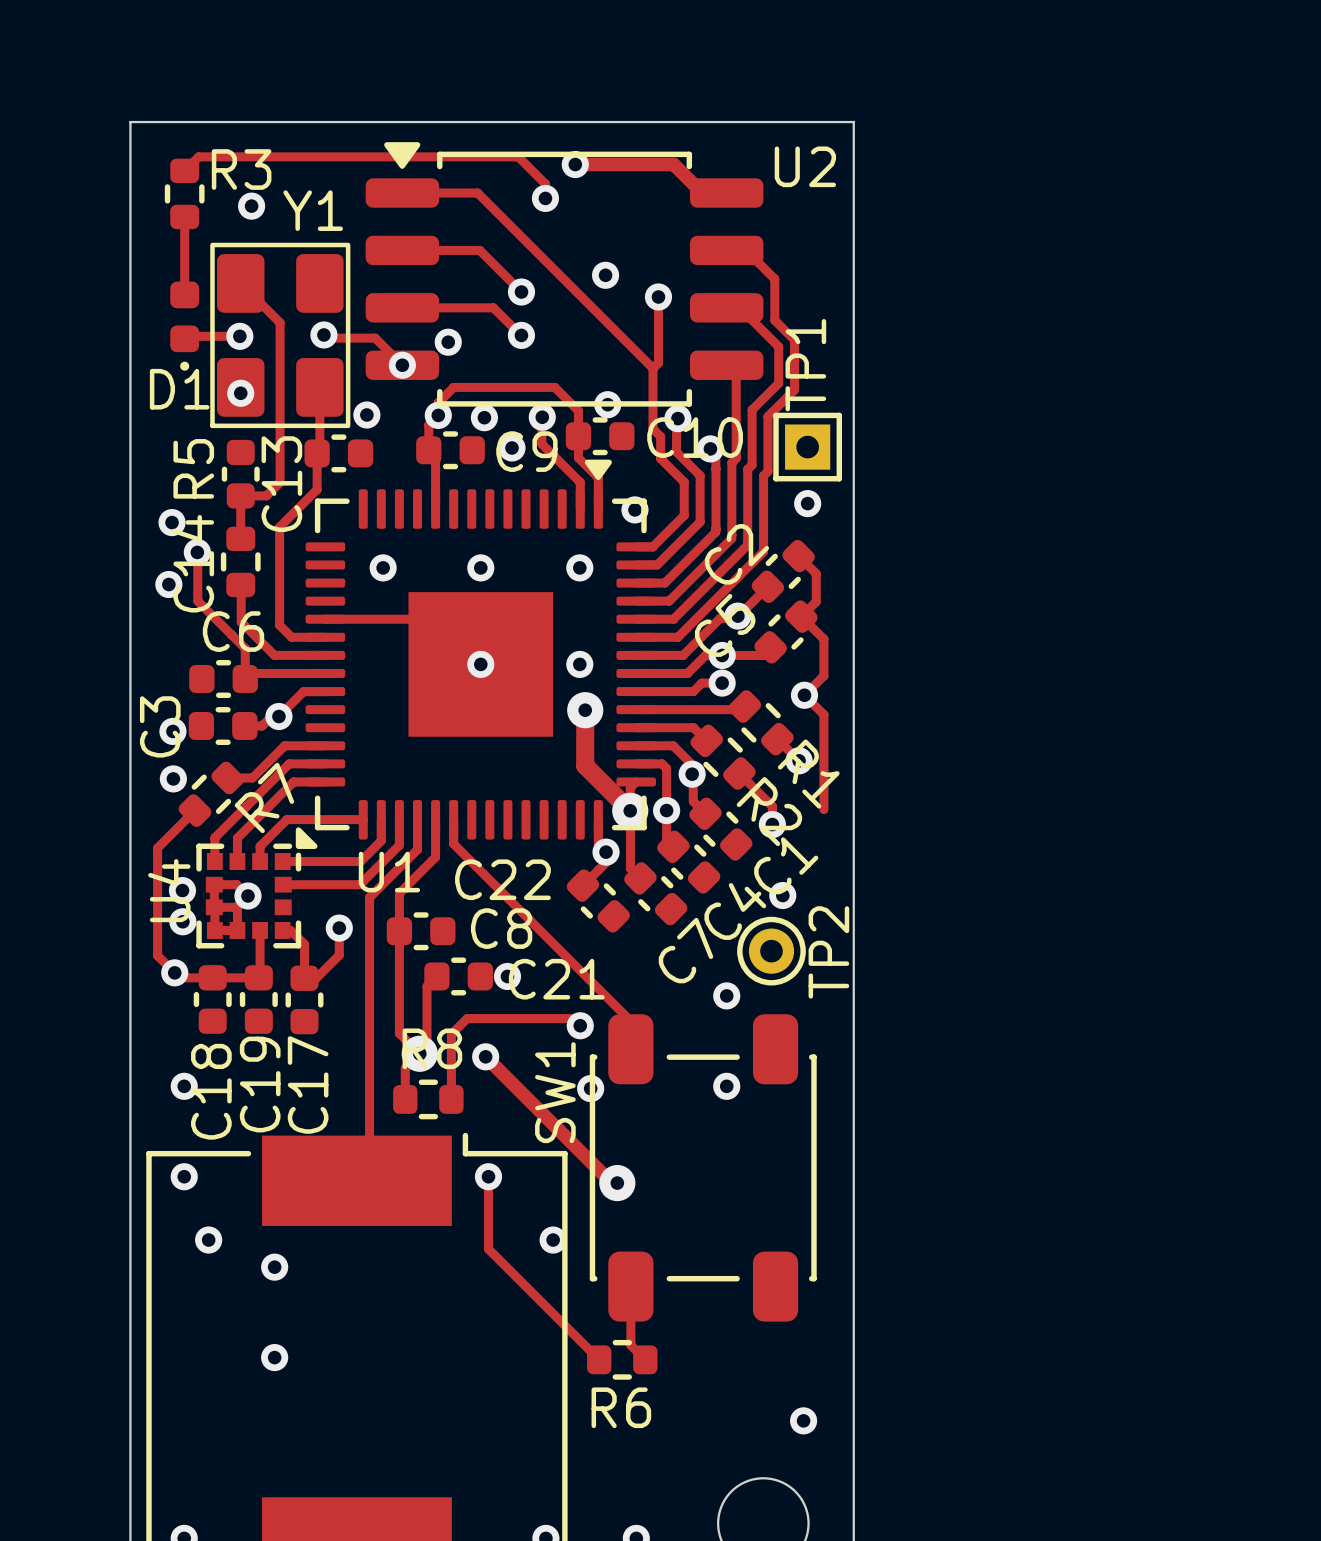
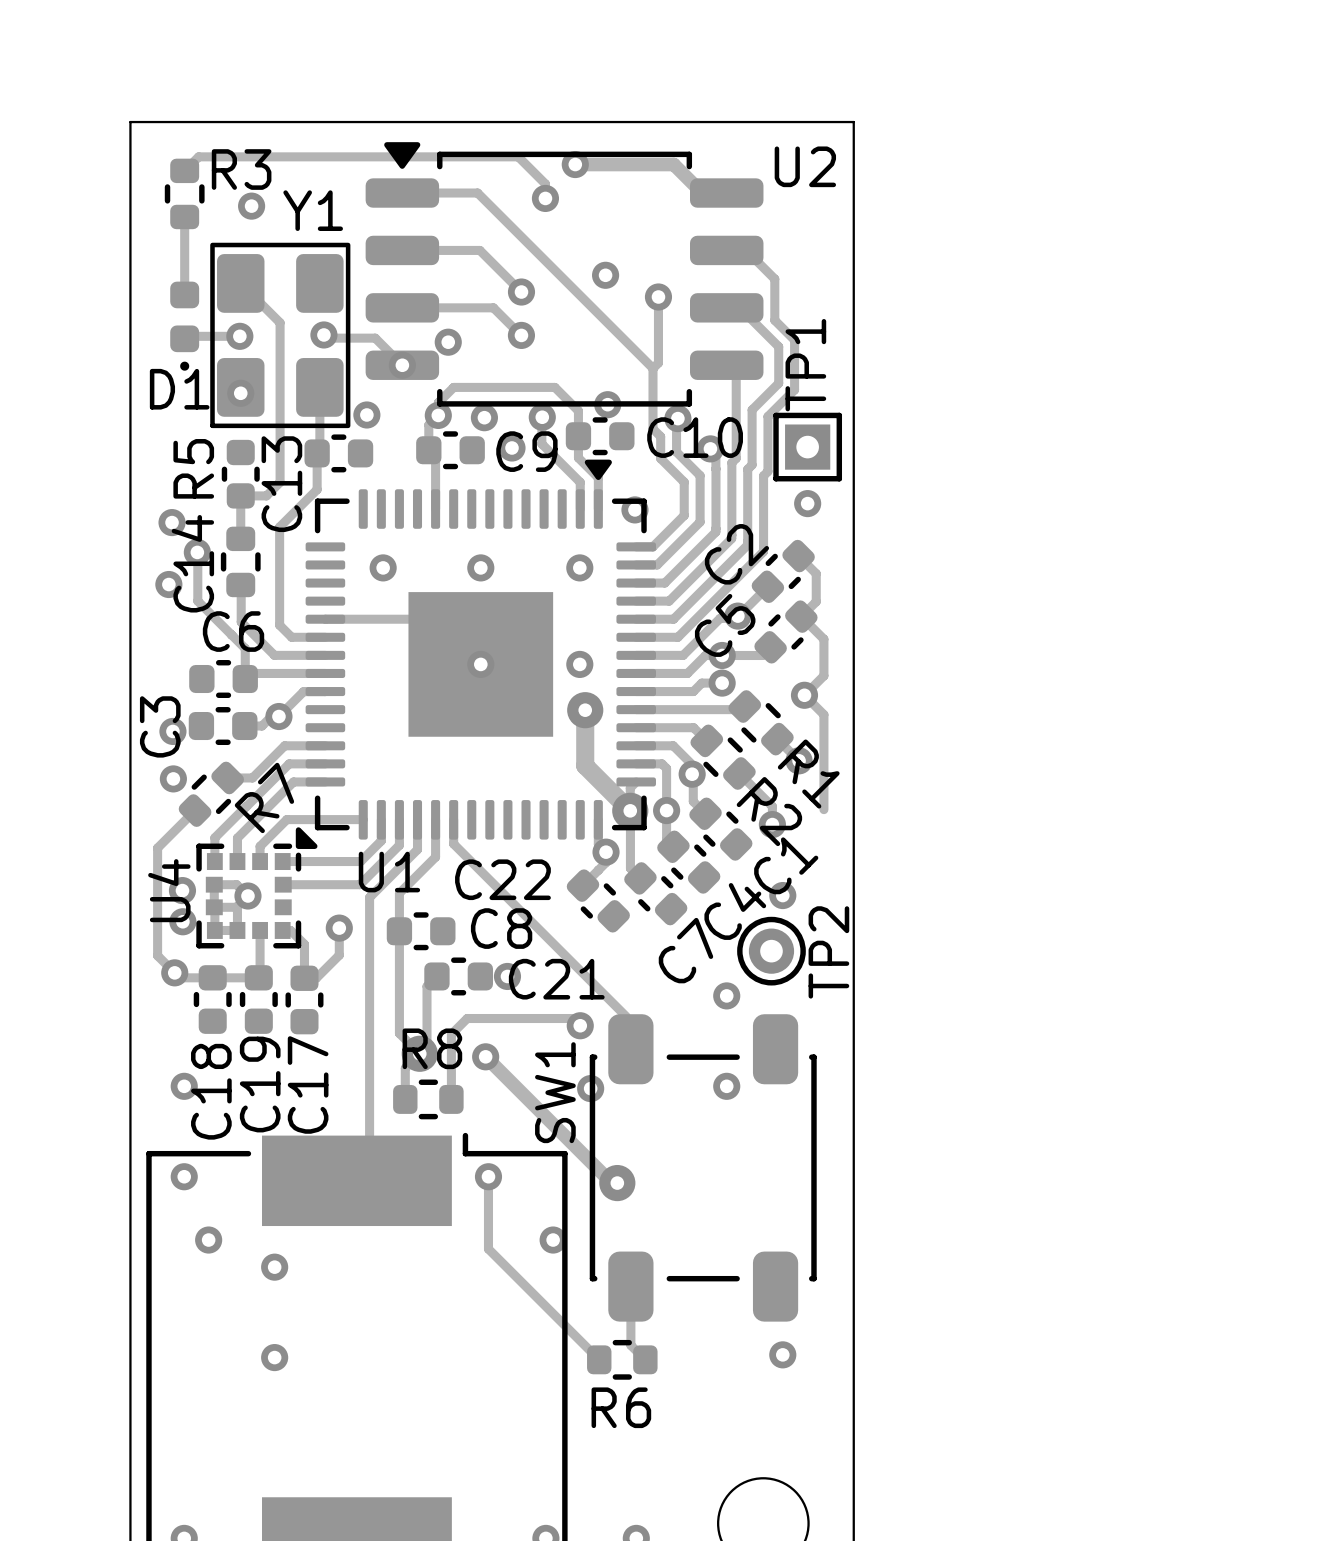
via position: (803, 1420) -> (782, 1354)

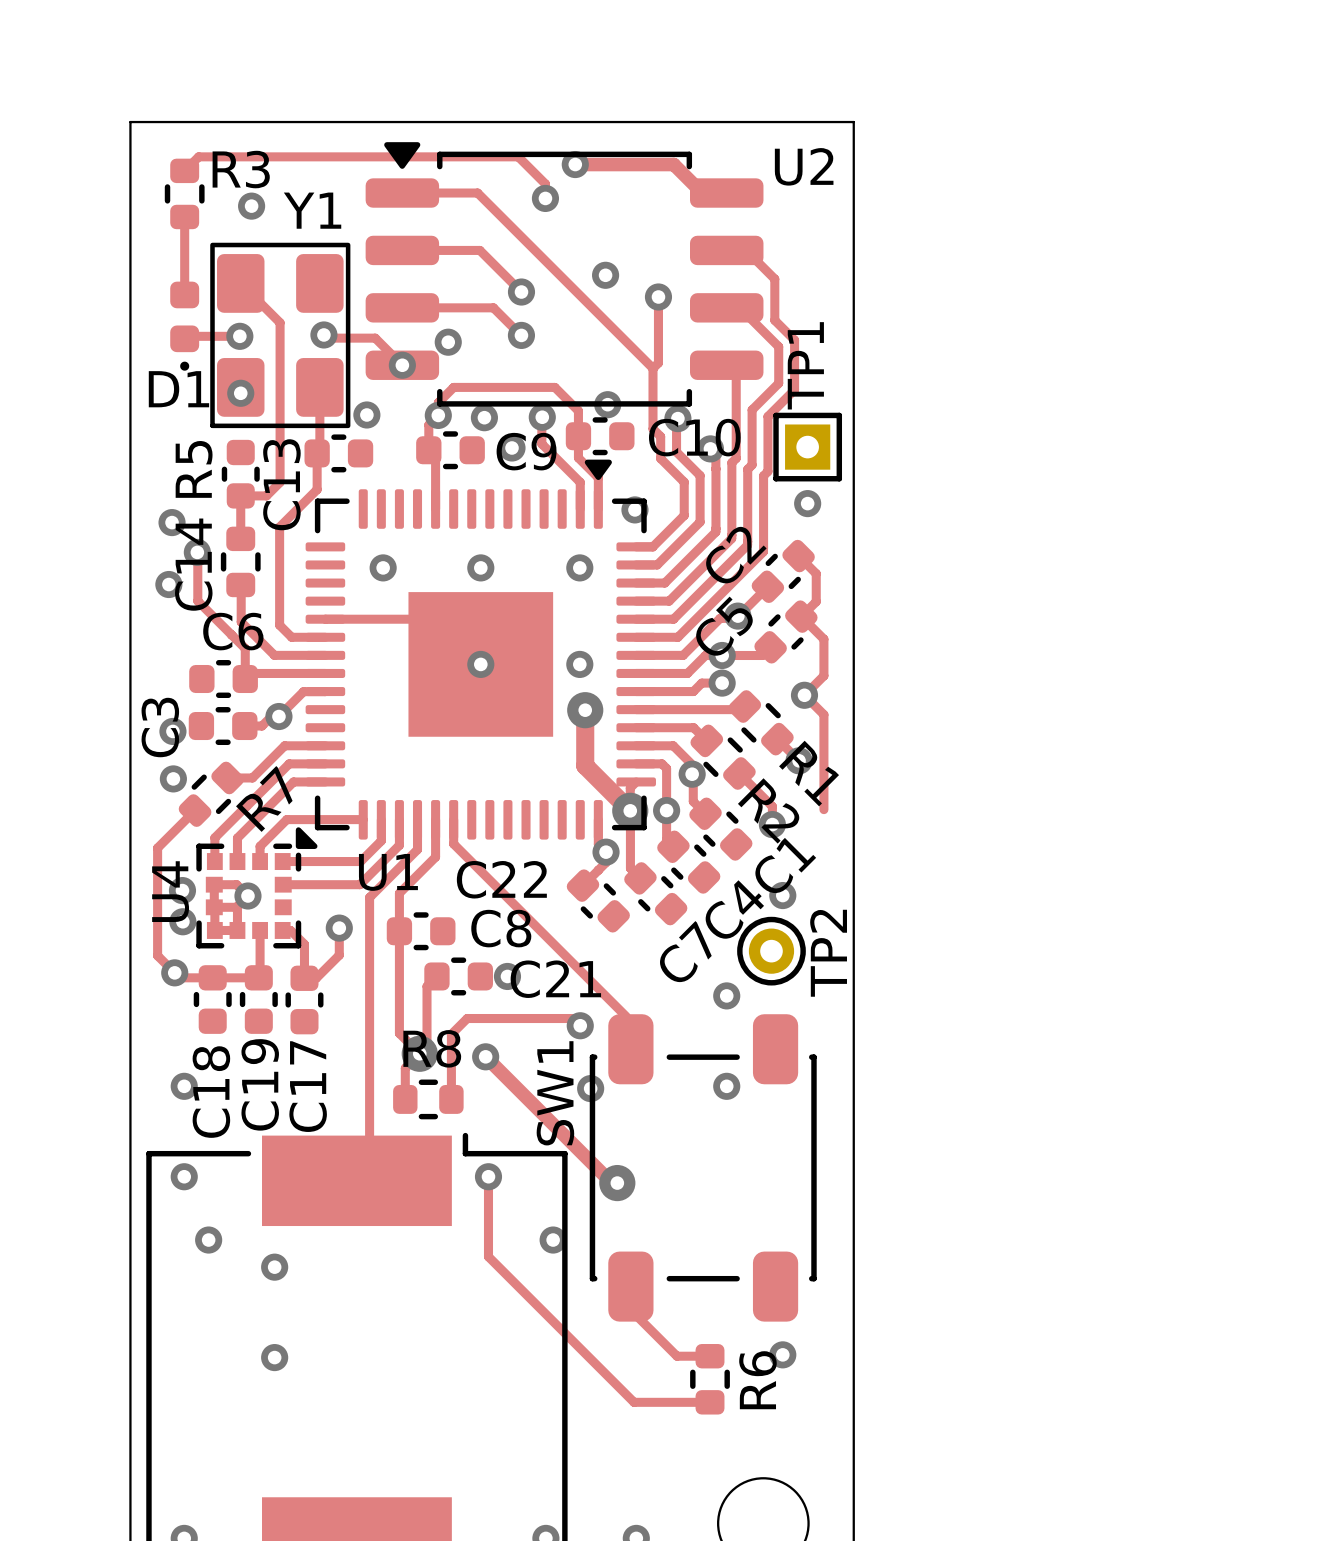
track: (488, 1249) (599, 1359) -> (488, 1249) (488, 1256) (634, 1402) (710, 1402)
track: (630, 1310) (630, 1345) (645, 1359) -> (630, 1310) (677, 1356) (710, 1356)
R6 rotation: 0° (622, 1359) -> 90° clockwise (710, 1379)
R6 position: (622, 1359) -> (710, 1379)

